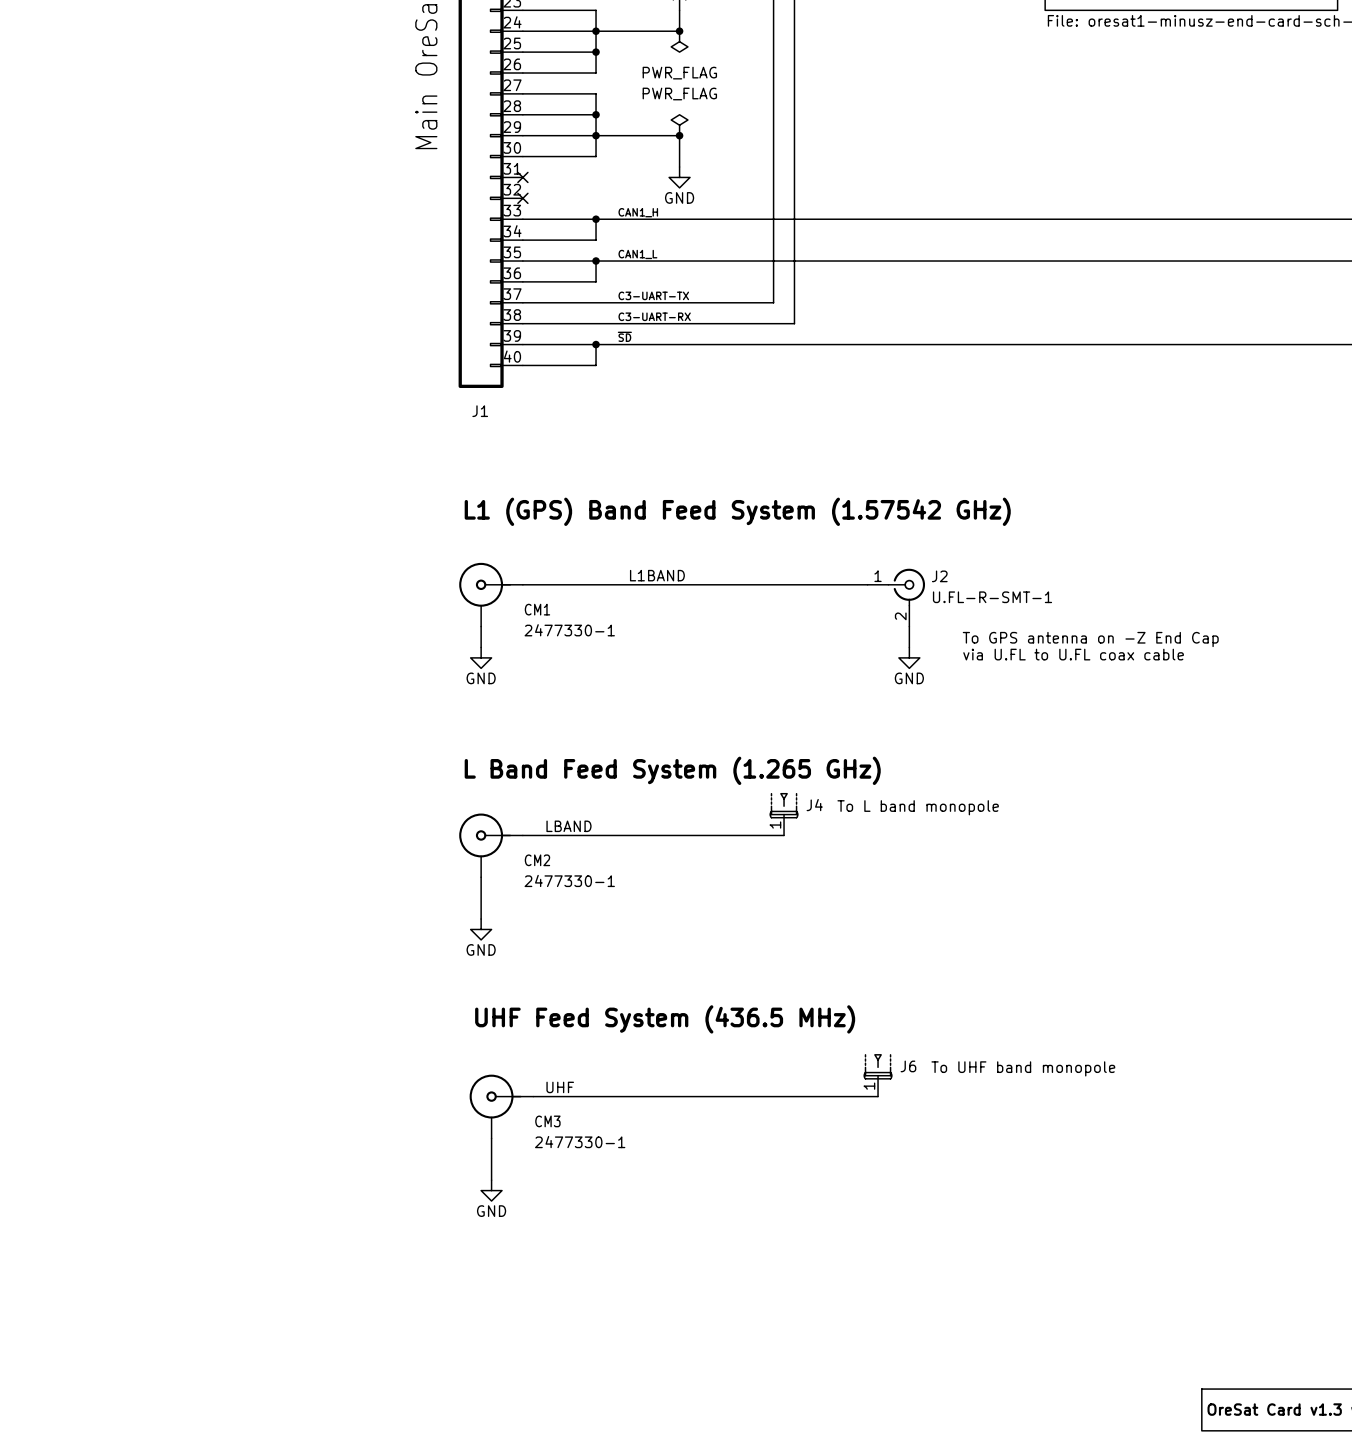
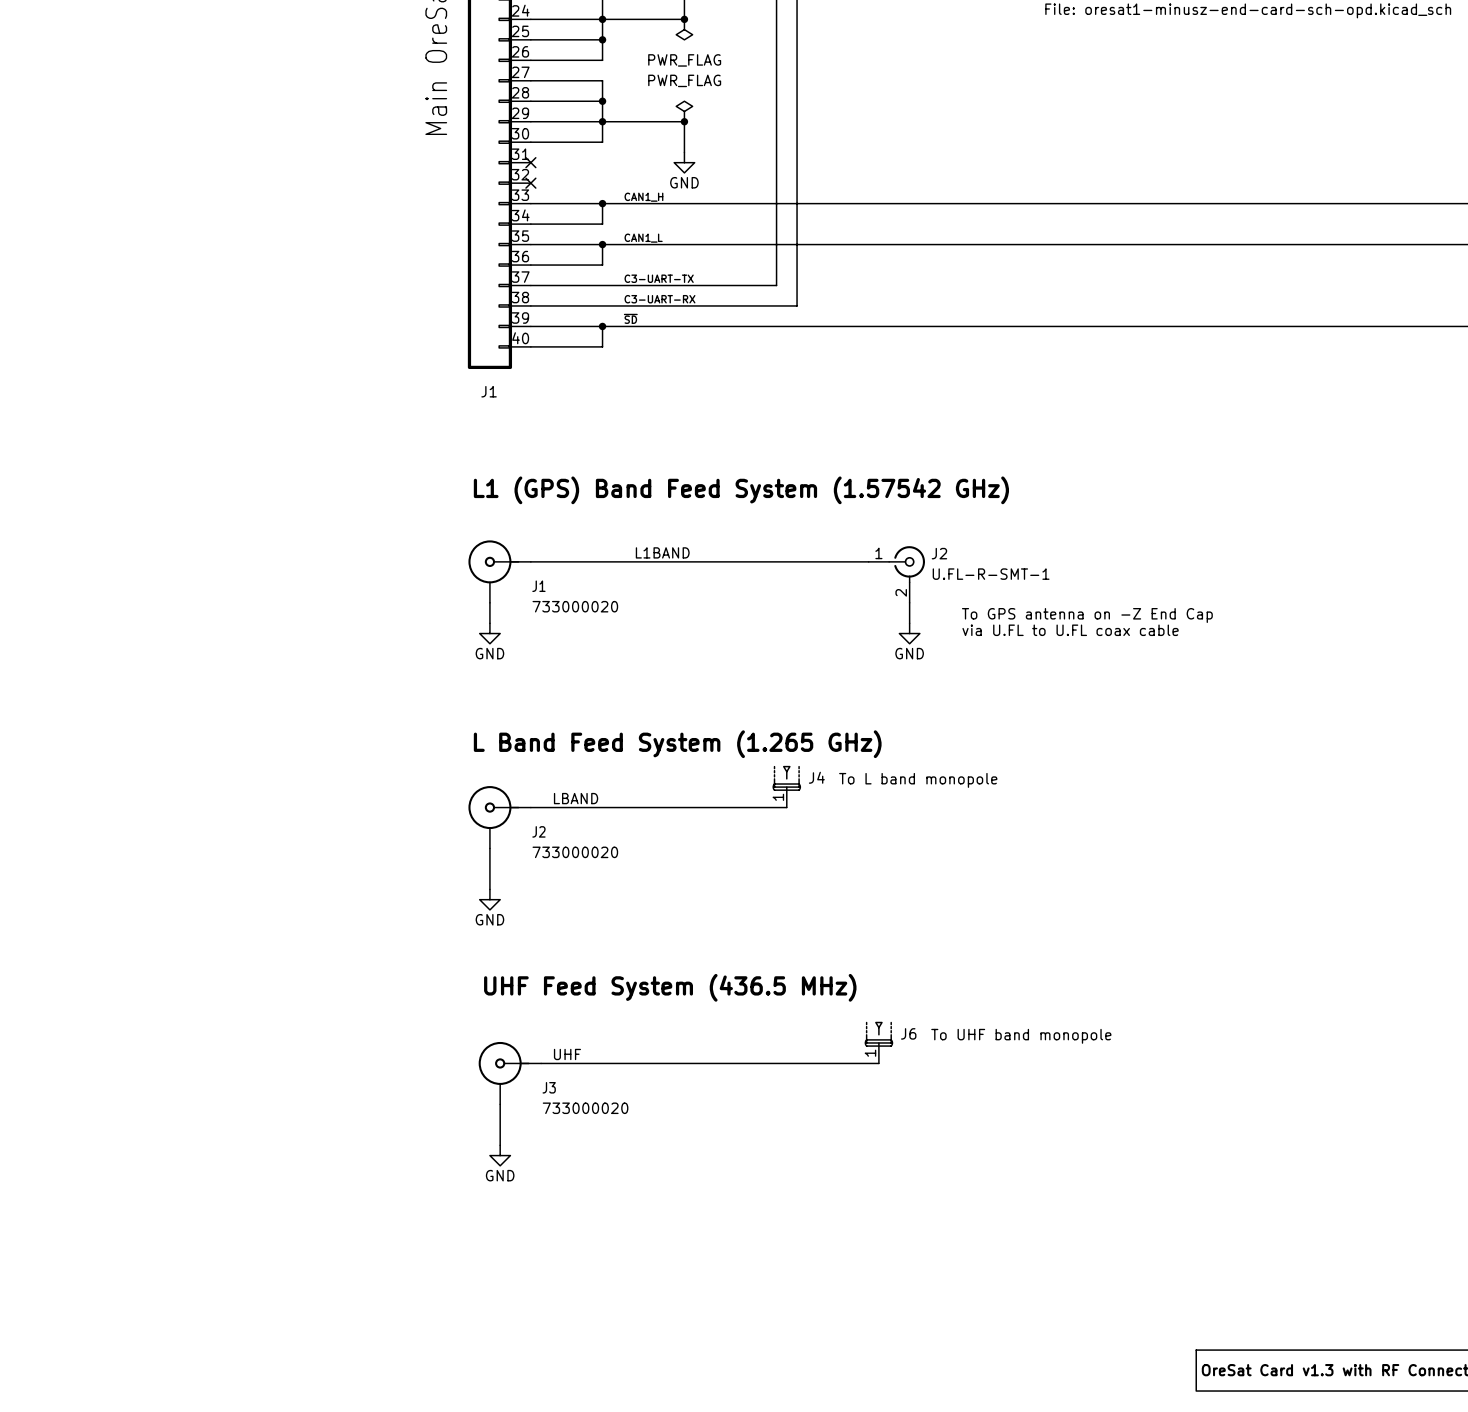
CM1 name: CM1 (537, 609) -> J1 (538, 586)
CM1 value: 2477330-1 (569, 630) -> 733000020 (575, 606)
CM2 name: CM2 (537, 860) -> J2 (538, 831)
CM2 value: 2477330-1 (569, 880) -> 733000020 (575, 852)
CM3 name: CM3 (547, 1121) -> J3 (549, 1087)
CM3 value: 2477330-1 (580, 1142) -> 733000020 (585, 1108)

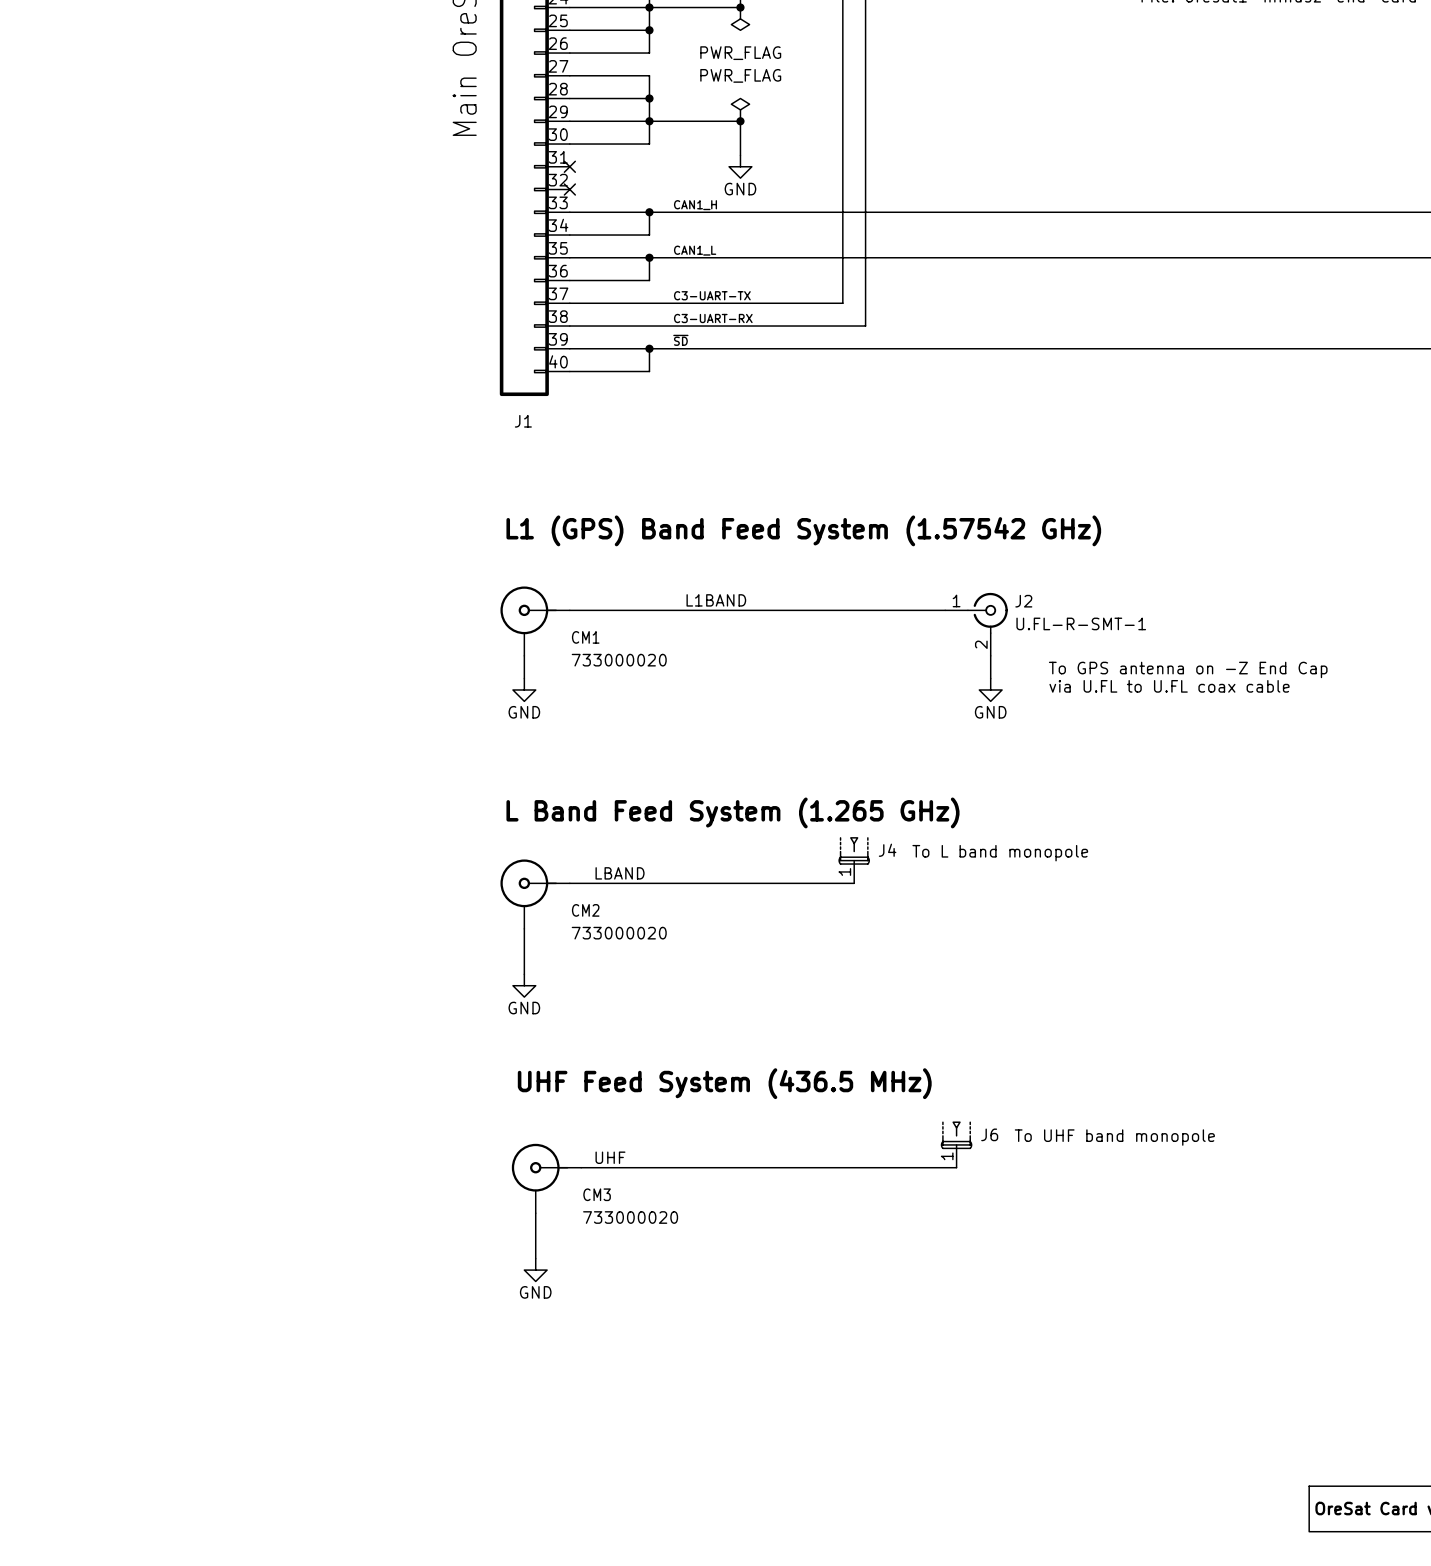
J1 name: J1 (538, 586) -> CM1 (585, 637)
J2 name: J2 (538, 831) -> CM2 (585, 910)
J3 name: J3 (549, 1087) -> CM3 (597, 1194)

